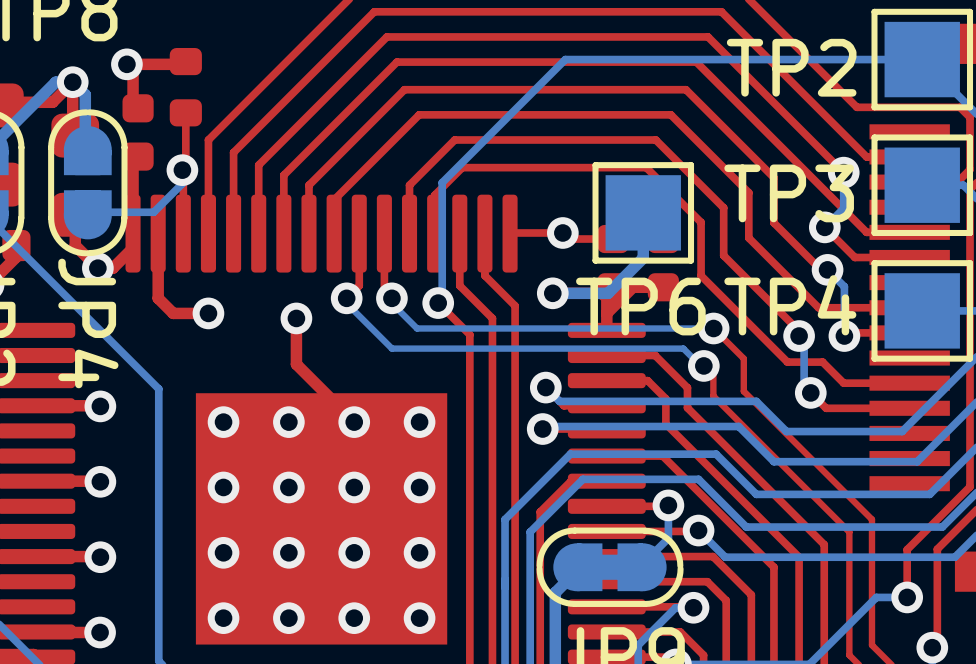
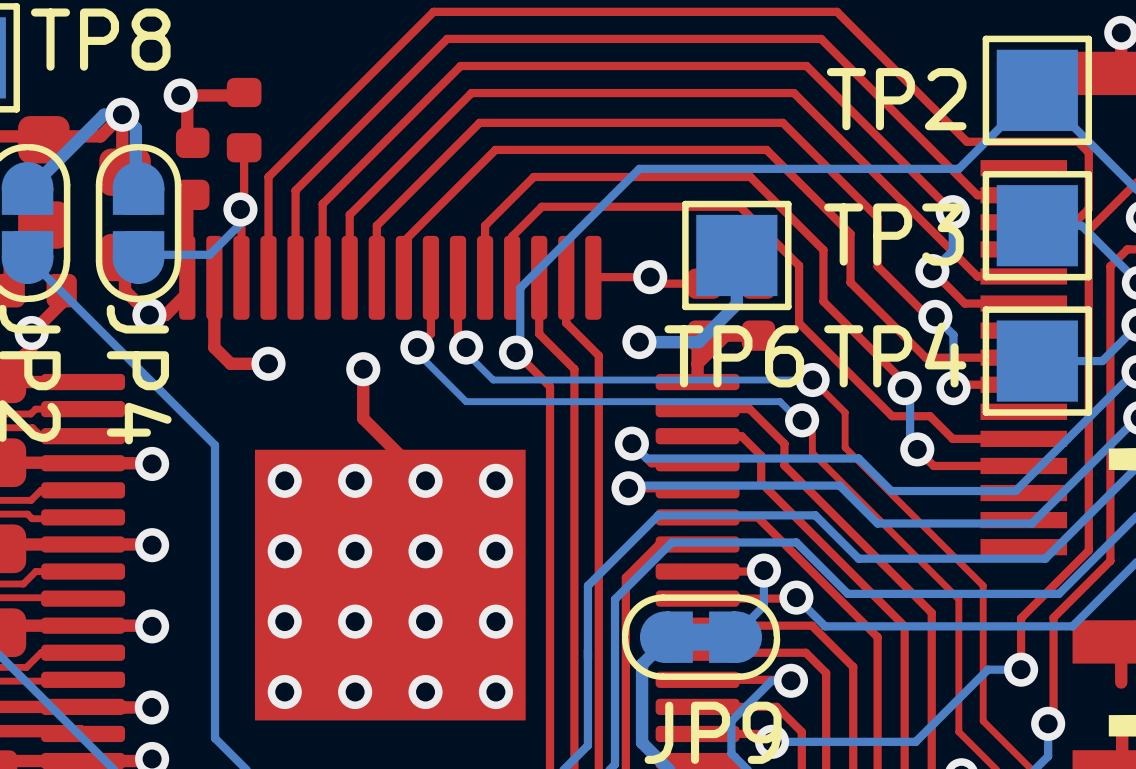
bottom track: (922, 59) (565, 59) (442, 182) (442, 243) -> (1037, 90) (958, 168) (639, 168) (520, 287)

